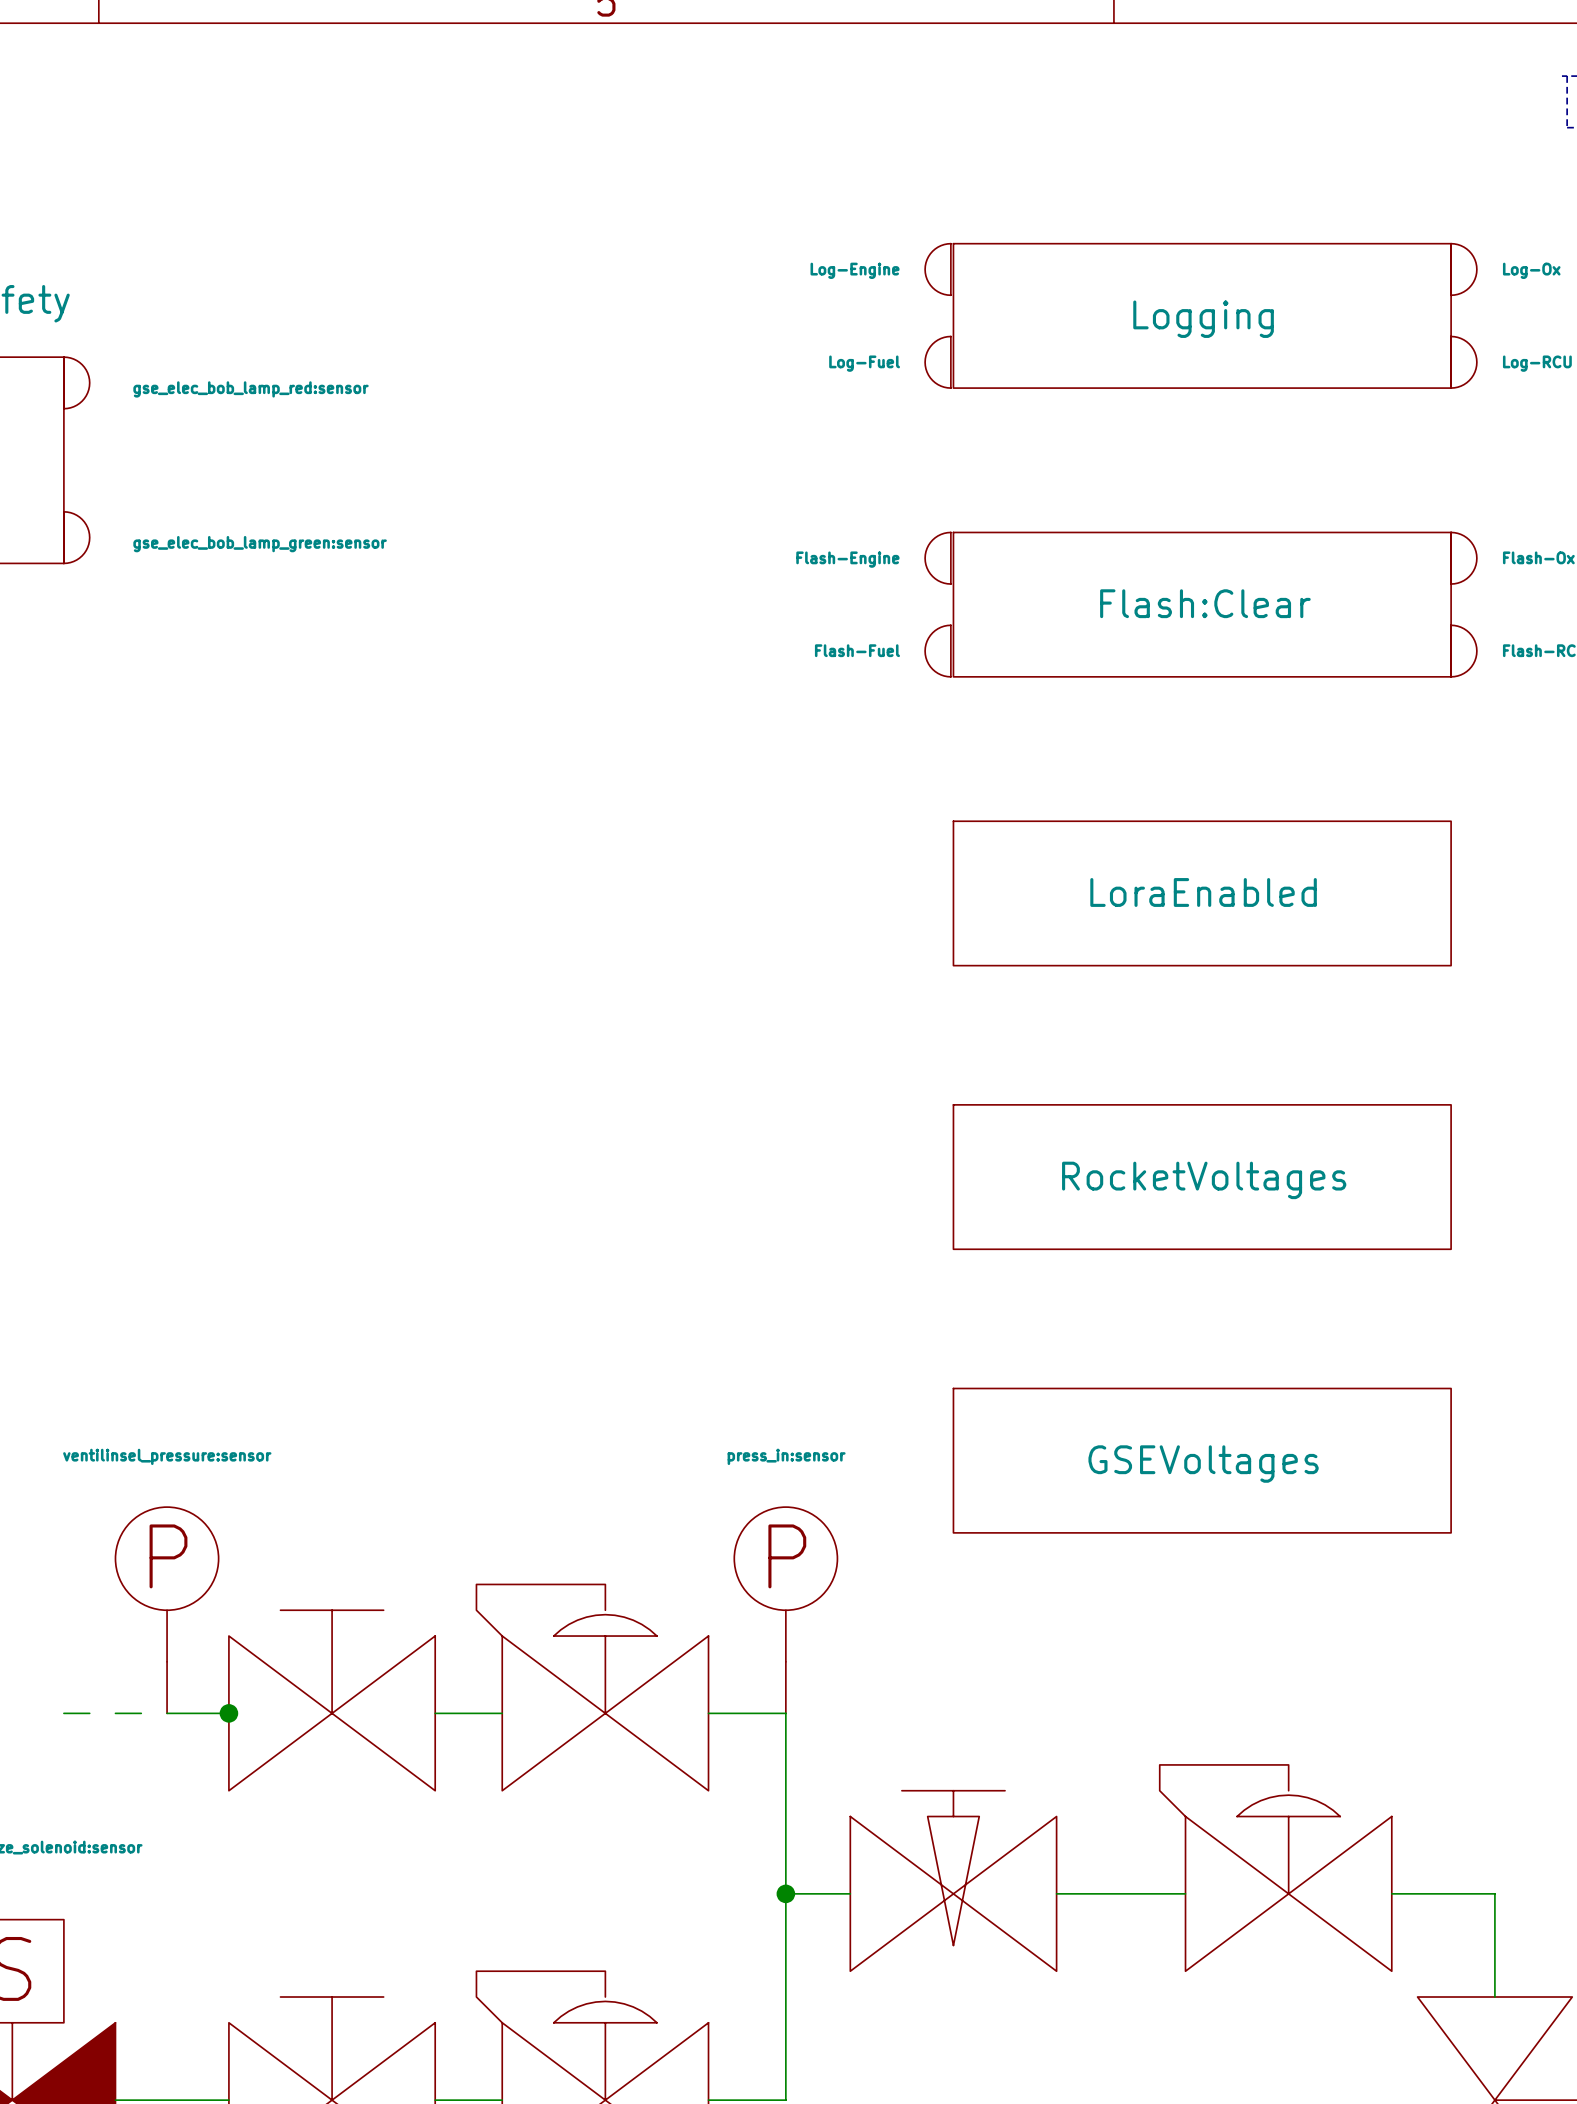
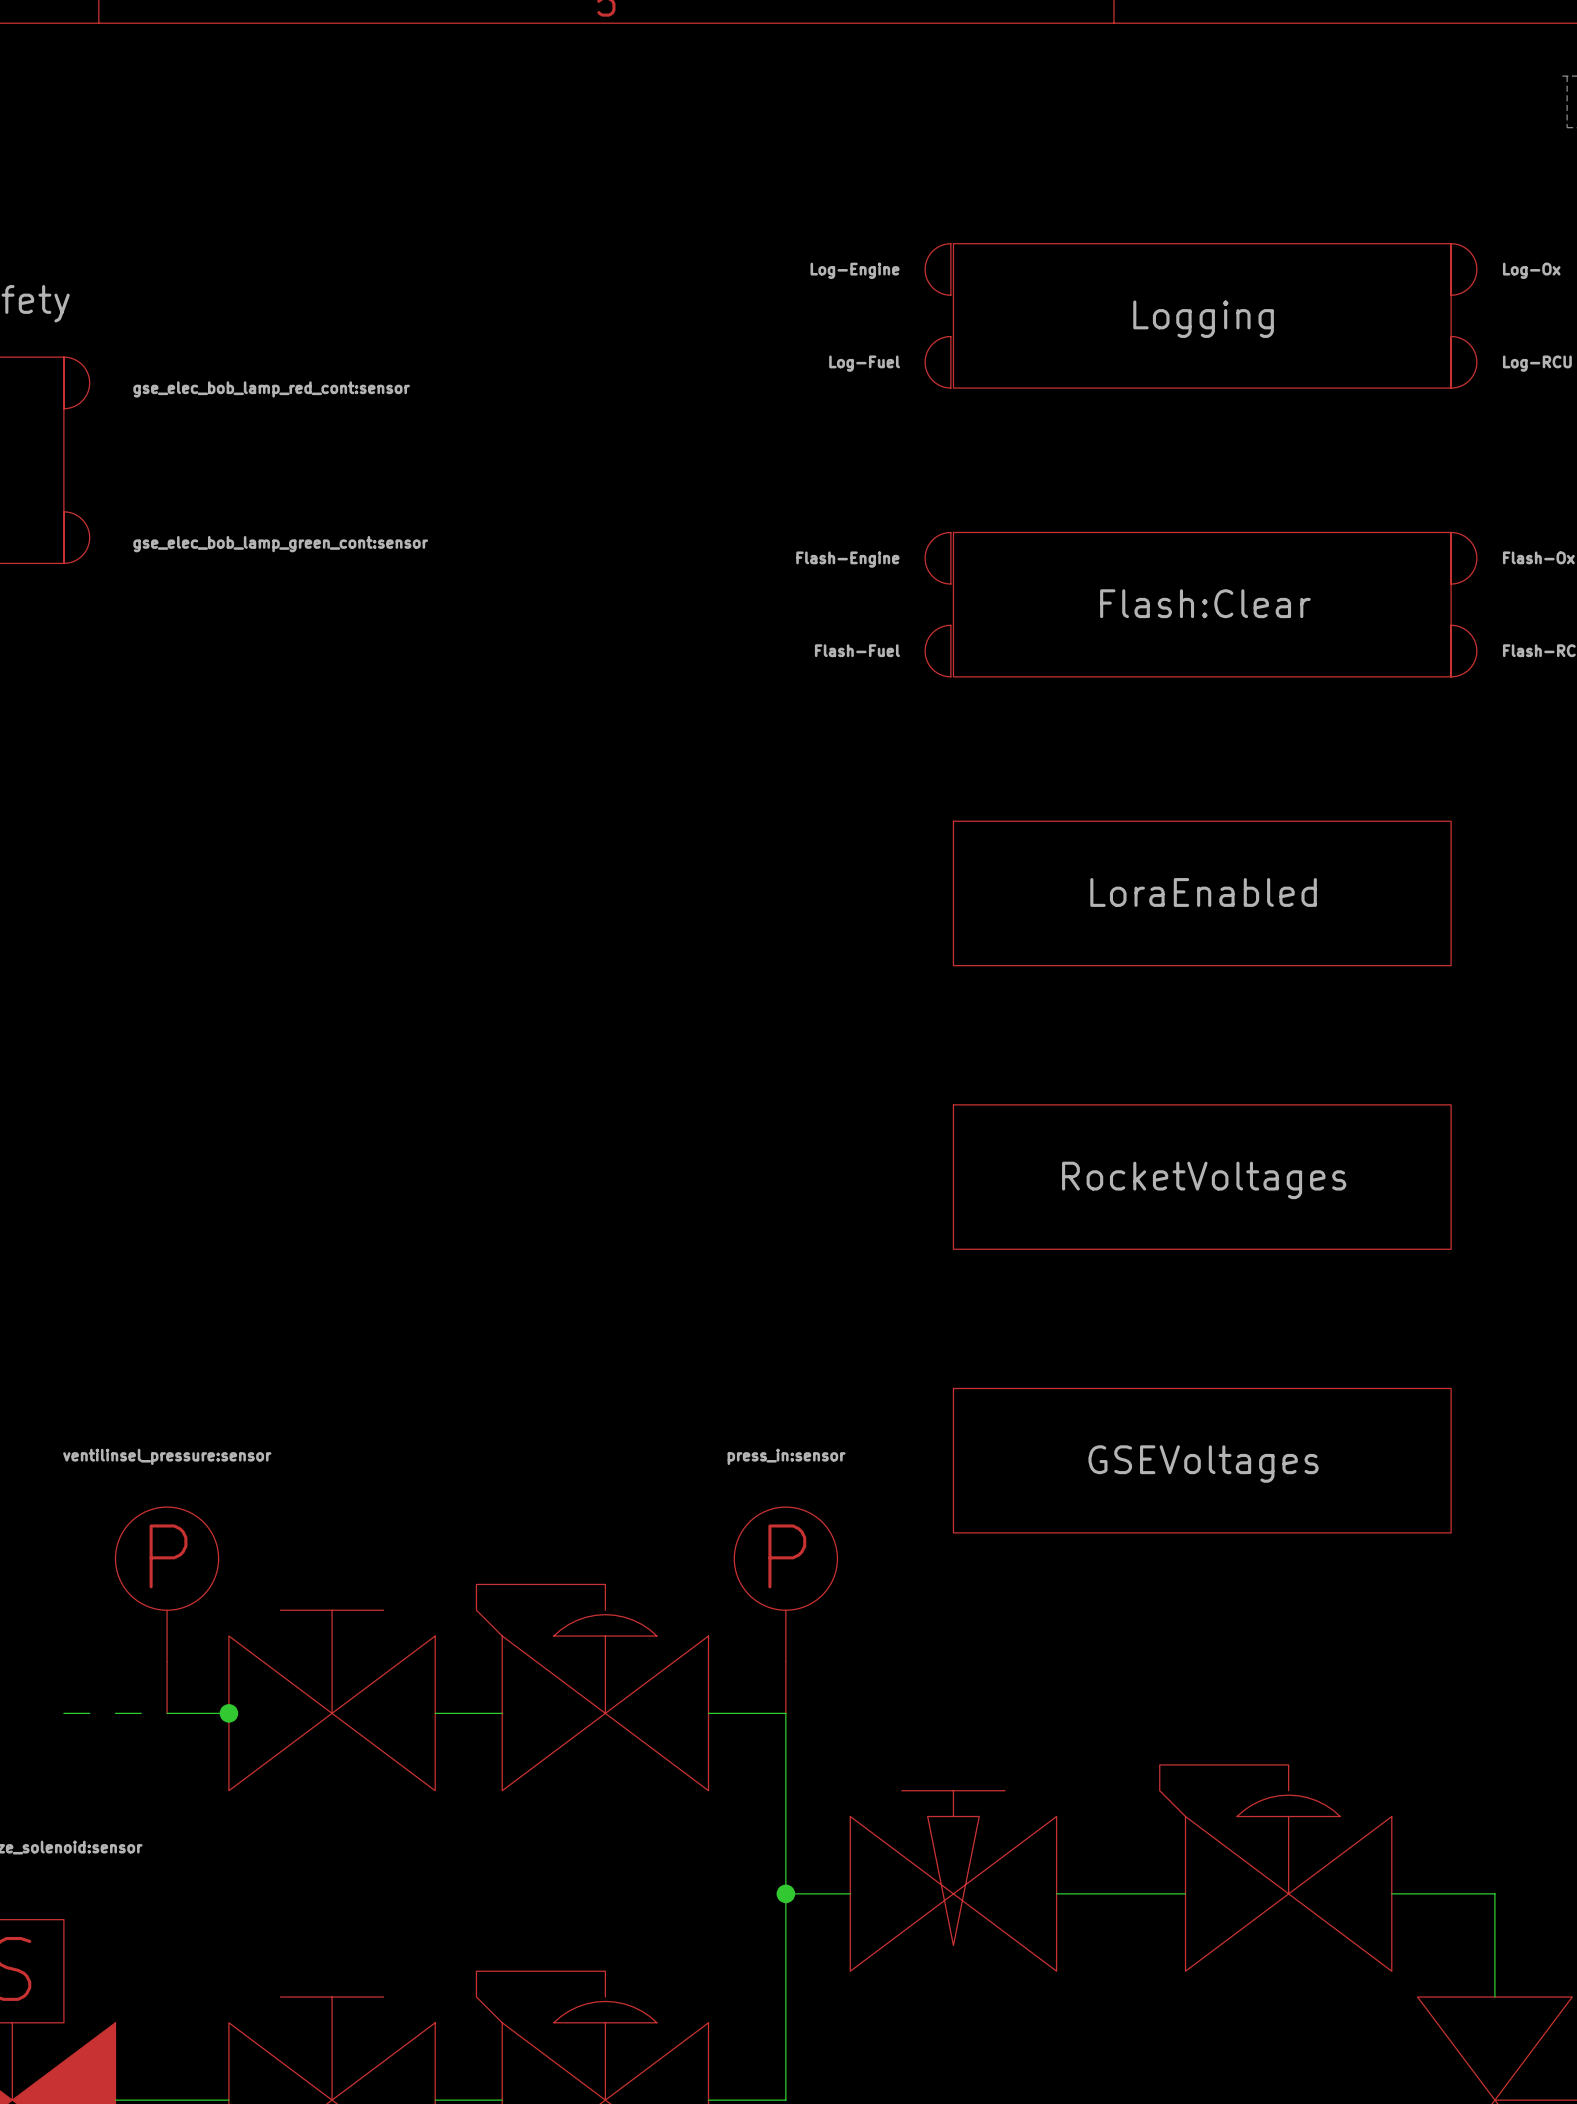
part value: gse_elec_bob_lamp_red:sensor (251, 389) -> gse_elec_bob_lamp_red_cont:sensor (271, 389)
part value: gse_elec_bob_lamp_green:sensor (260, 544) -> gse_elec_bob_lamp_green_cont:sensor (280, 544)

